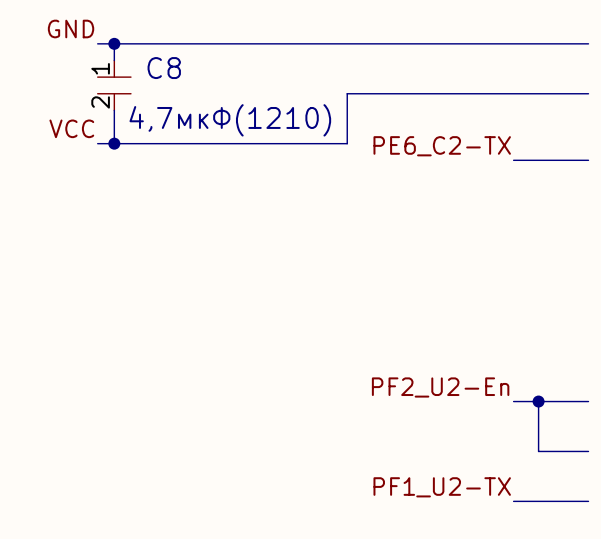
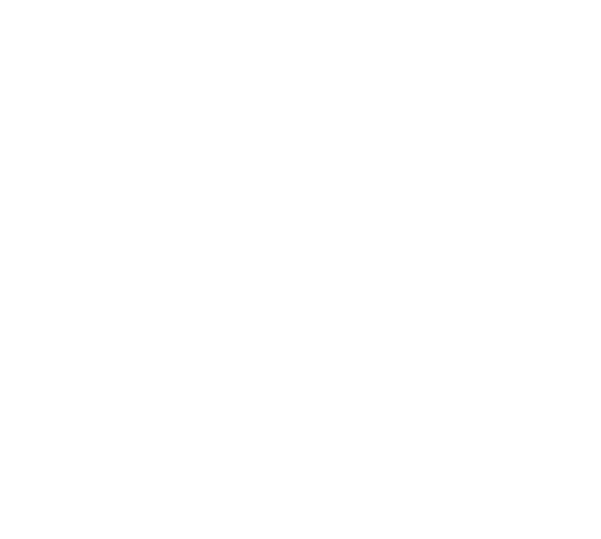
label: GND (71, 29) -> none
wire: (97, 43) (588, 43) -> none
wire: (114, 43) (114, 60) -> none
junction: (114, 43) -> none
C8: 4,7мкФ(1210) (114, 85) -> none
wire: (588, 93) (347, 93) (347, 143) (97, 143) -> none
wire: (114, 110) (114, 143) -> none
label: VCC (71, 128) -> none
junction: (114, 143) -> none
label: PE6_C2-TX (442, 146) -> none
wire: (513, 160) (588, 160) -> none
label: PF2_U2-En (440, 387) -> none
wire: (513, 401) (588, 401) -> none
wire: (538, 401) (538, 451) (588, 451) -> none
junction: (538, 401) -> none
label: PF1_U2-TX (442, 487) -> none
wire: (513, 501) (588, 501) -> none

